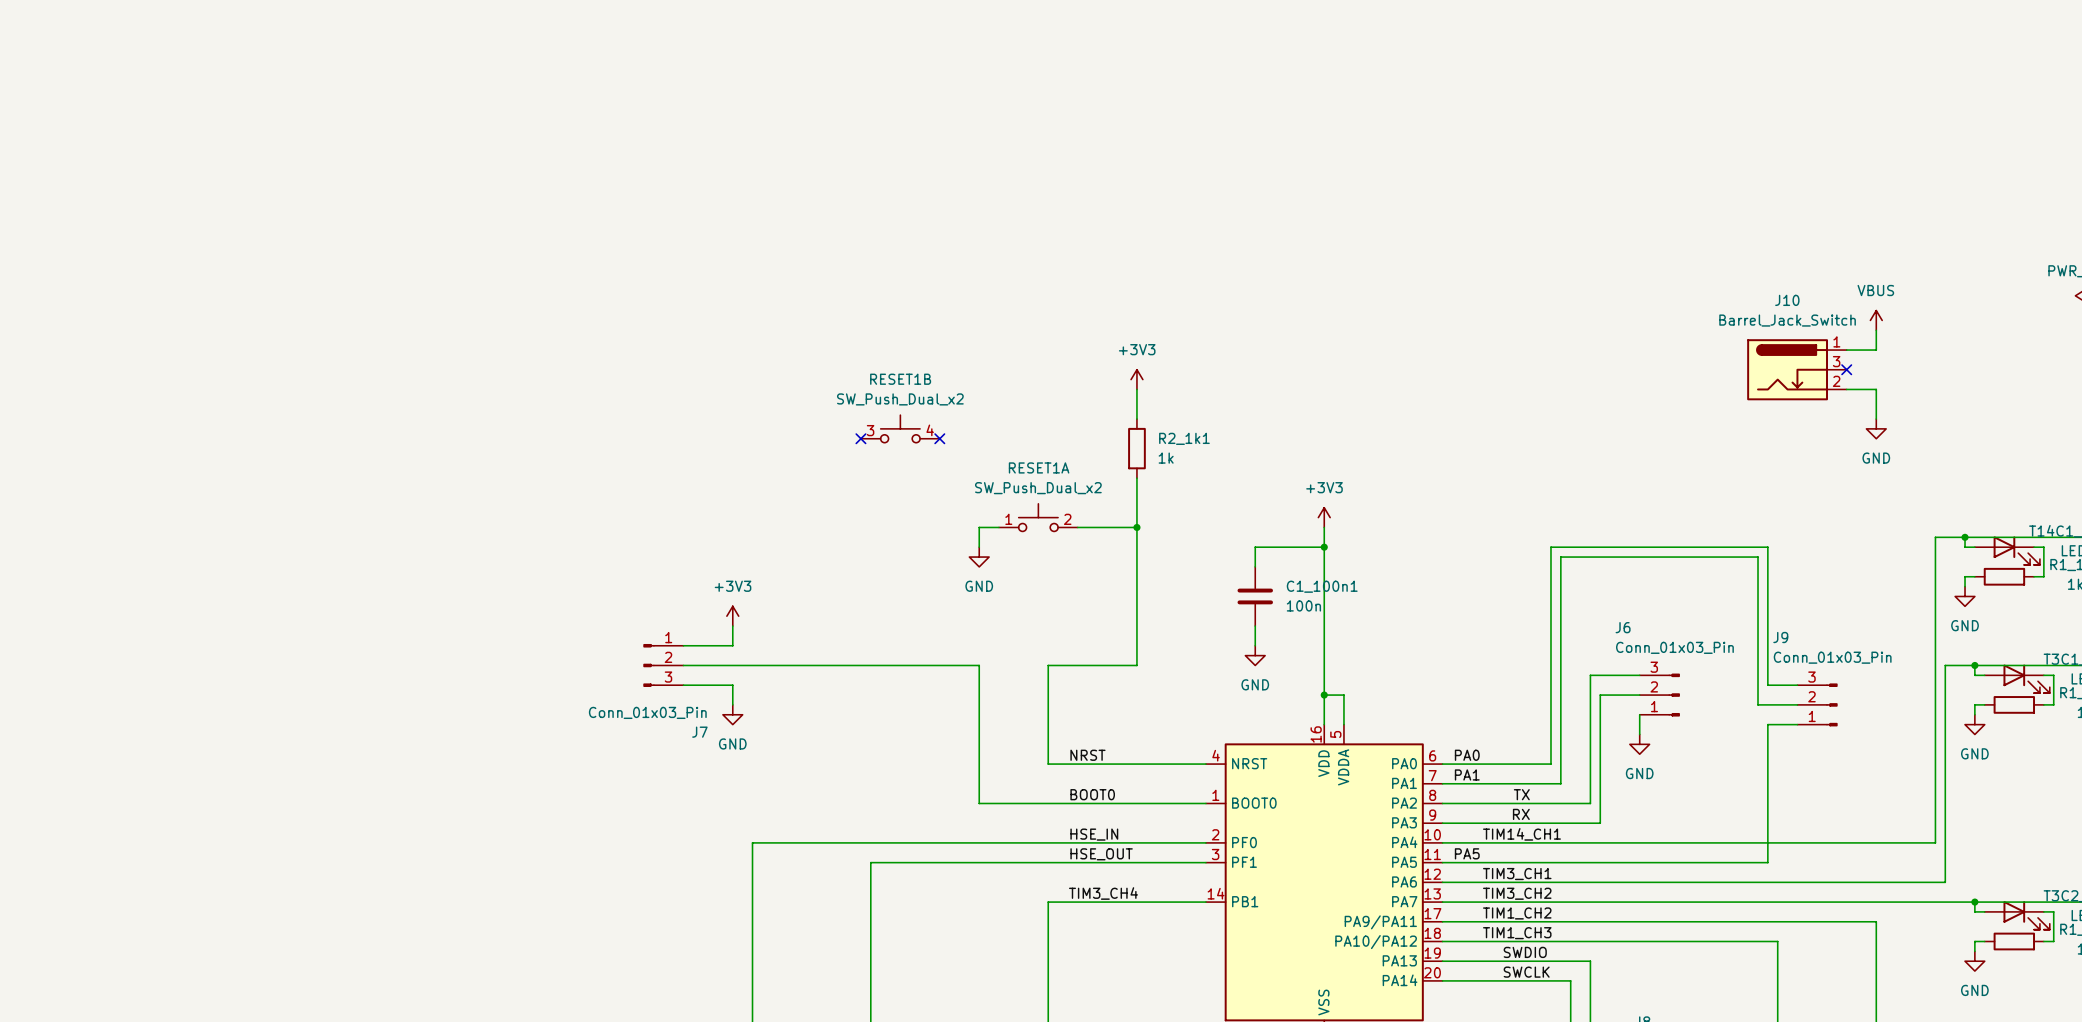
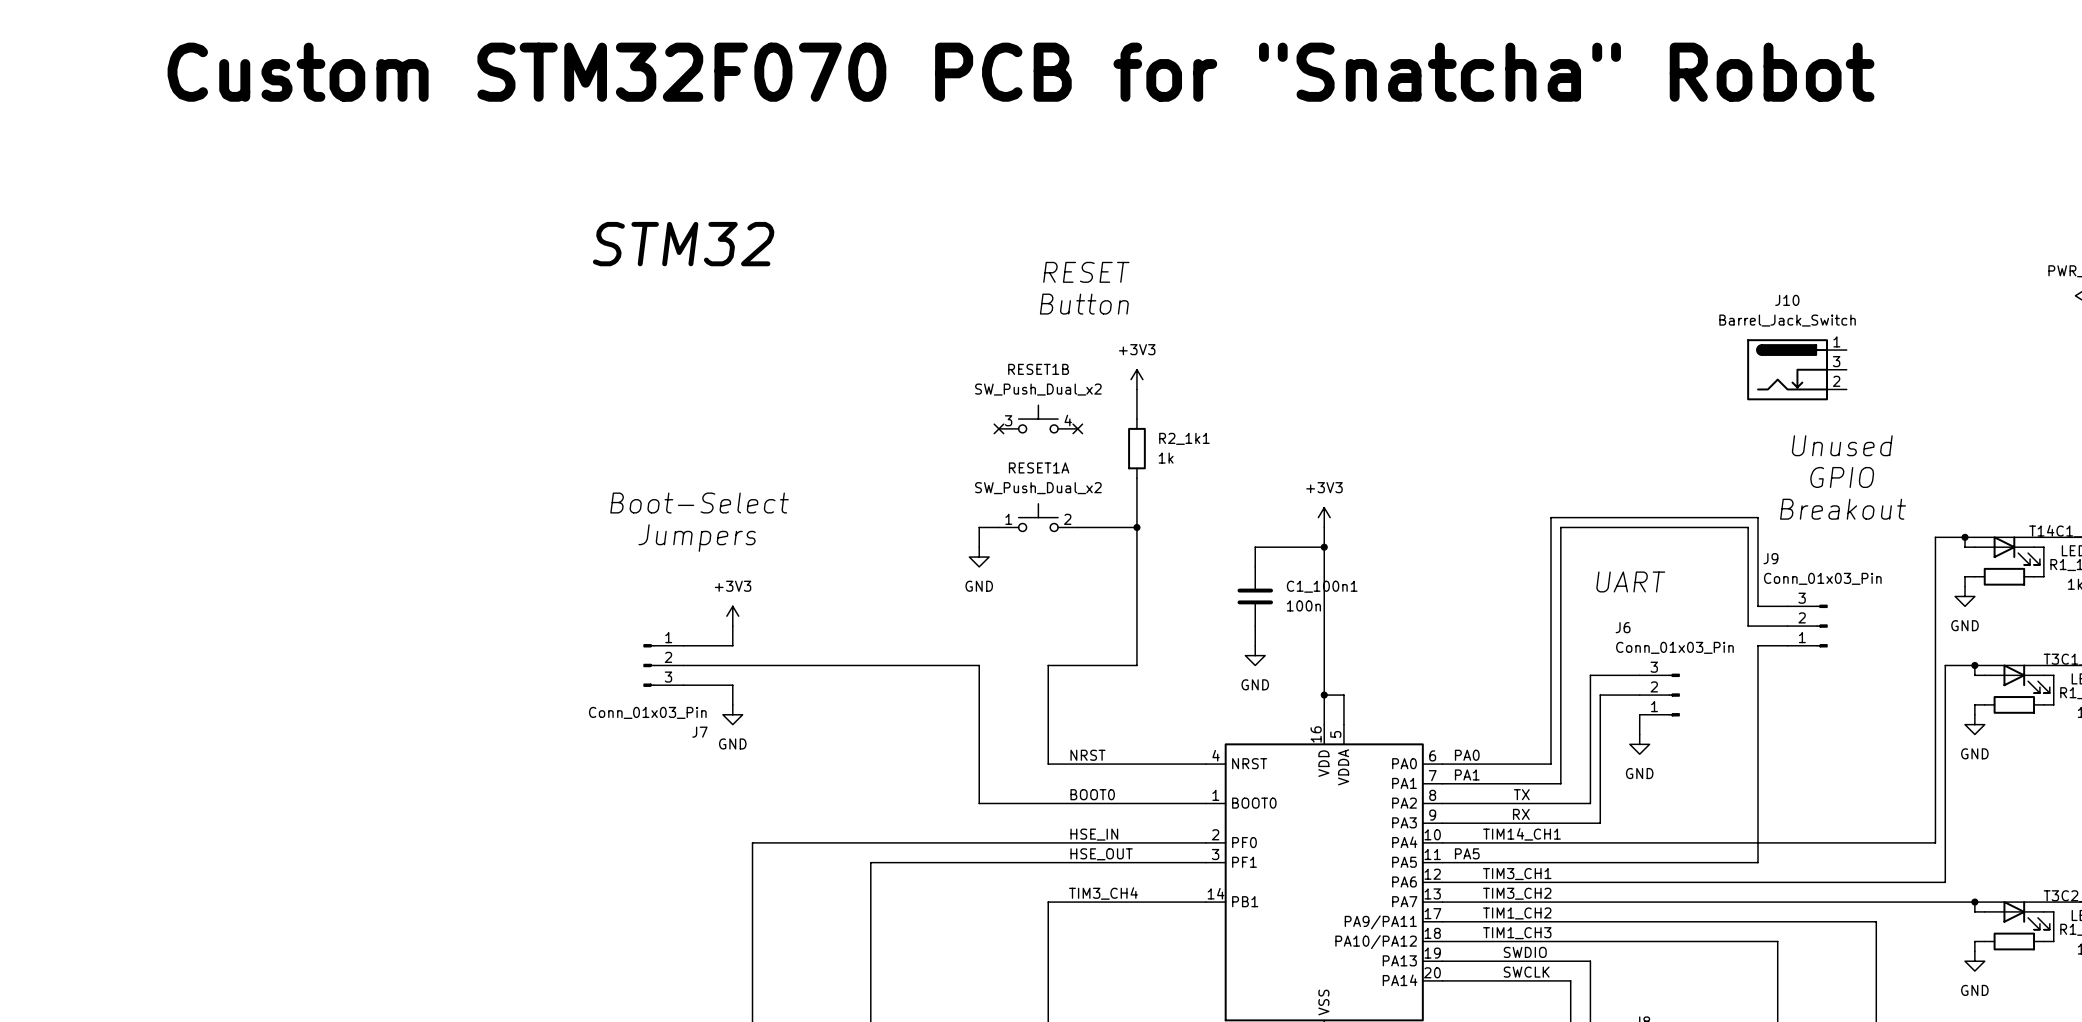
text: none -> Custom STM32F070 PCB for "Snatcha" Robot (1021, 72)
text: none -> STM32 (683, 244)
text: none -> RESET (1086, 272)
text: none -> Button (1084, 304)
power symbol: VBUS (1876, 320) -> none
wire: (1876, 330) (1876, 350) (1846, 350) -> none
no-connect mark: (1846, 369) -> none
wire: (1846, 389) (1876, 389) (1876, 419) -> none
RESET1B position: (900, 428) -> (1038, 419)
no-connect mark: none -> (998, 428)
no-connect mark: none -> (1077, 428)
power symbol: GND (1876, 428) -> none
no-connect mark: (860, 438) -> none
no-connect mark: (939, 438) -> none
text: none -> Unused (1842, 445)
text: none -> GPIO (1842, 477)
text: none -> Boot-Select (699, 503)
text: none -> Breakout (1843, 509)
text: none -> Jumpers (697, 538)
wire: (1550, 547) (1767, 547) (1767, 685) (1797, 685) -> none
wire: (1560, 557) (1758, 557) -> (1550, 547) (1550, 517) (1758, 517) (1758, 557)
wire: none -> (1560, 557) (1560, 527) (1748, 527) (1748, 626) (1787, 626)
text: none -> UART (1630, 581)
wire: (1758, 606) (1758, 645) -> (1758, 606) (1787, 606)
wire: none -> (1758, 645) (1787, 645)
wire: (1758, 704) (1797, 704) -> none
J9 position: (1817, 704) -> (1807, 626)
wire: (1797, 724) (1767, 724) (1767, 862) (1758, 862) -> (1758, 704) (1758, 862)

